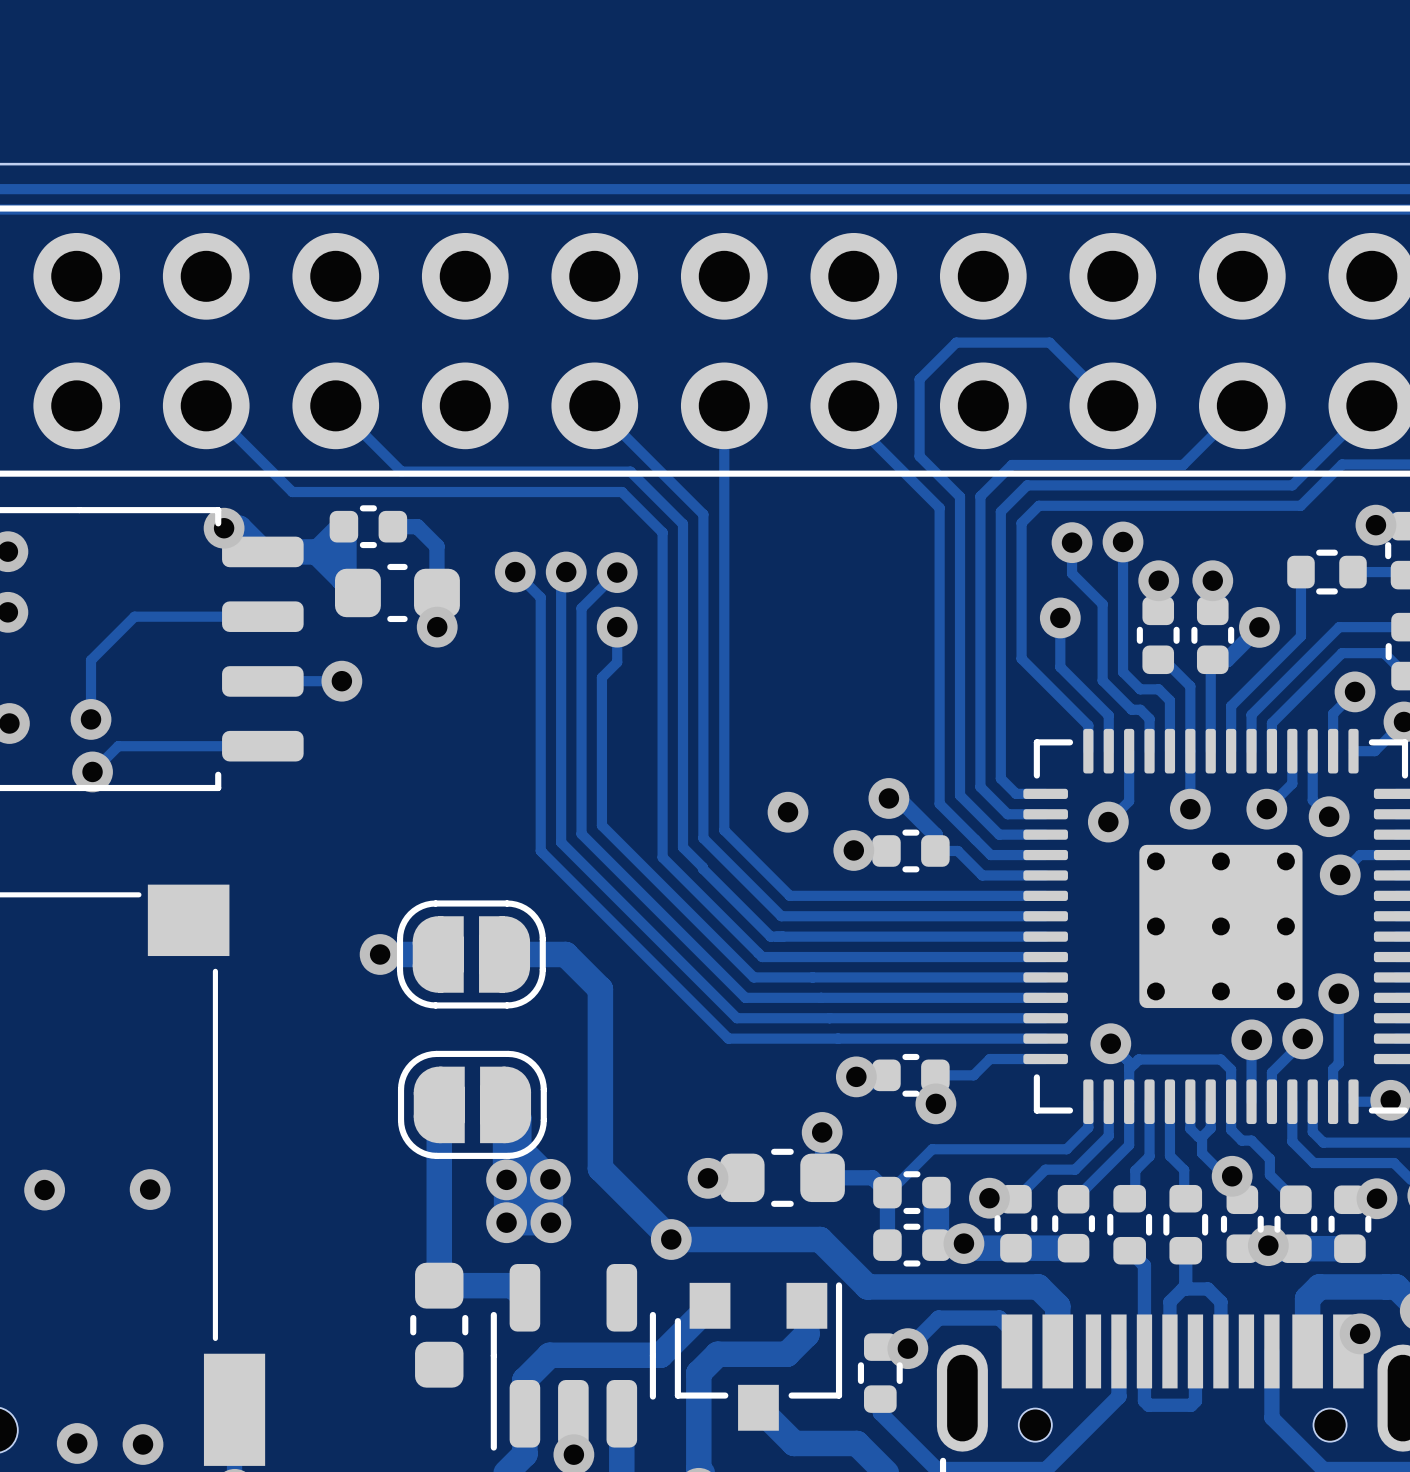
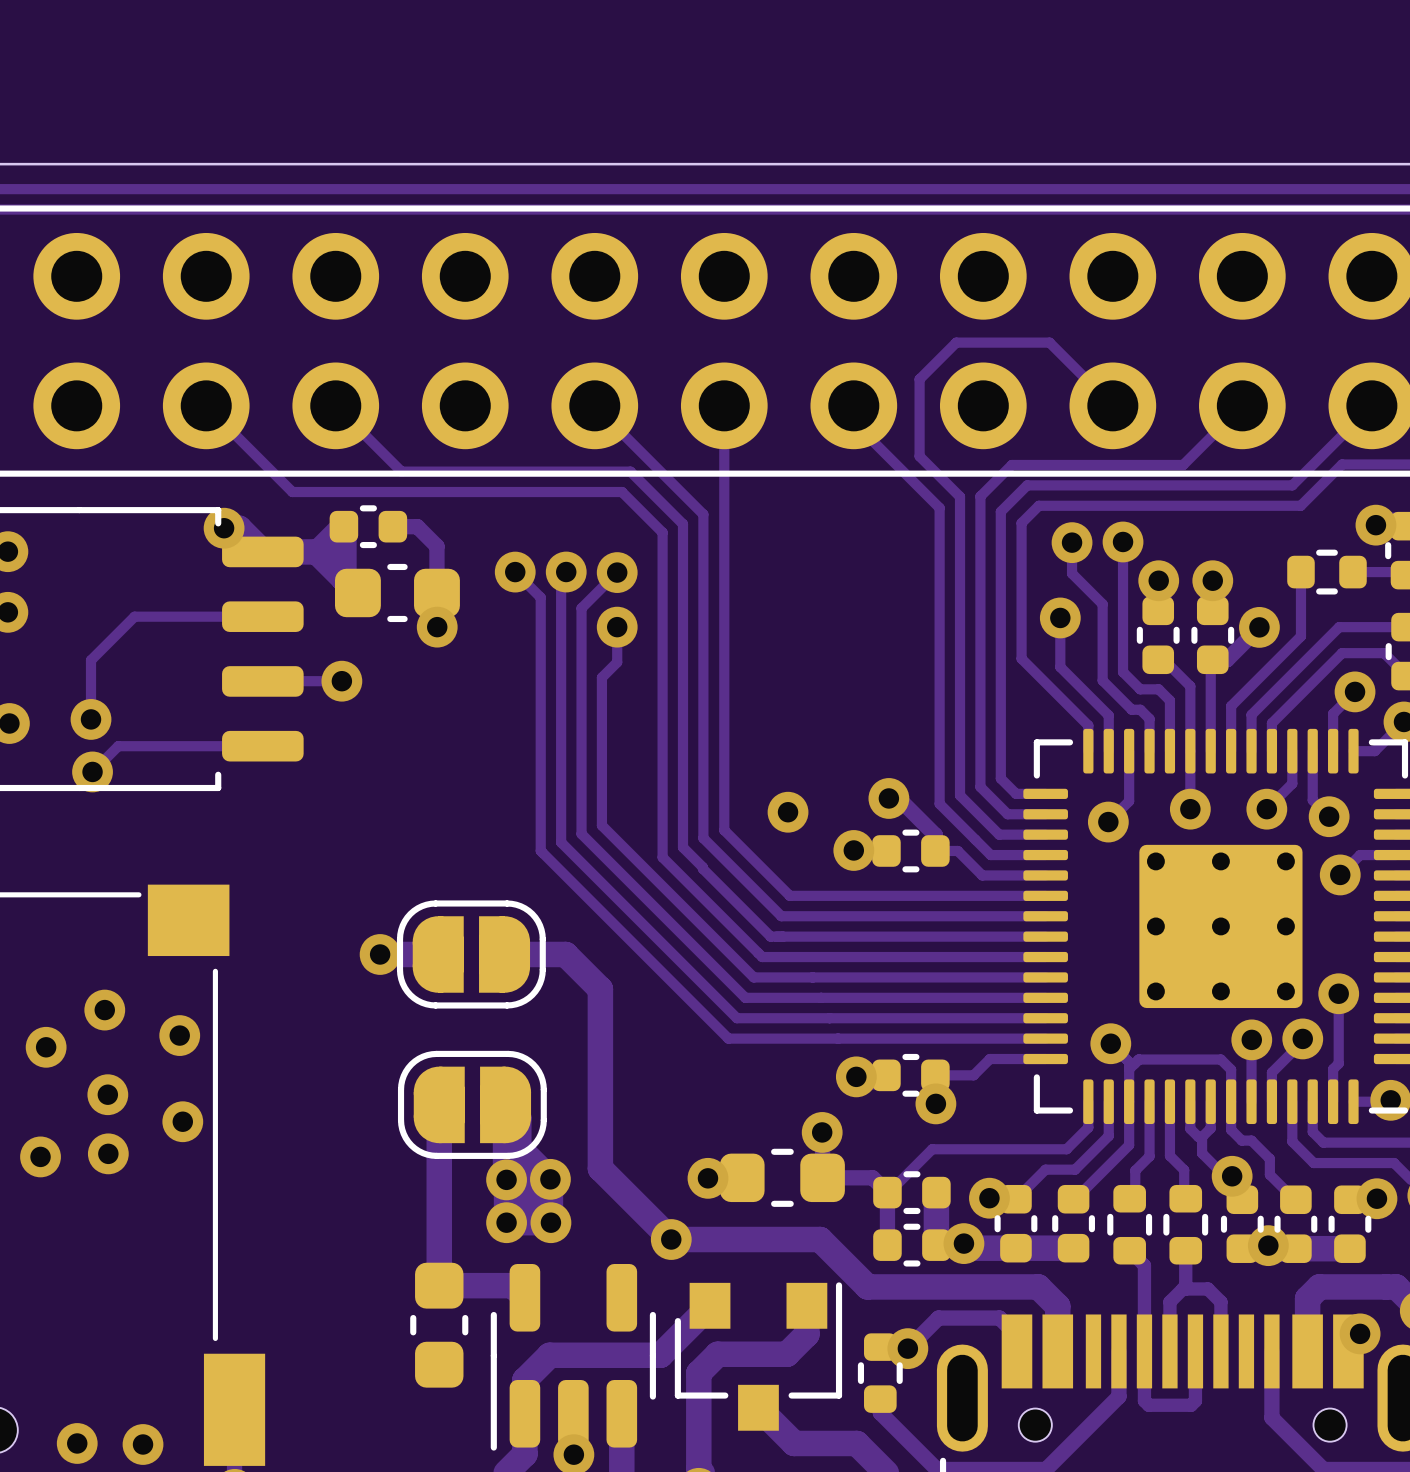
via: none -> (104, 1010)
via: none -> (179, 1035)
via: none -> (46, 1047)
via: none -> (107, 1094)
via: none -> (182, 1121)
via: none -> (108, 1153)
via: (150, 1189) -> none
via position: (44, 1190) -> (40, 1156)

